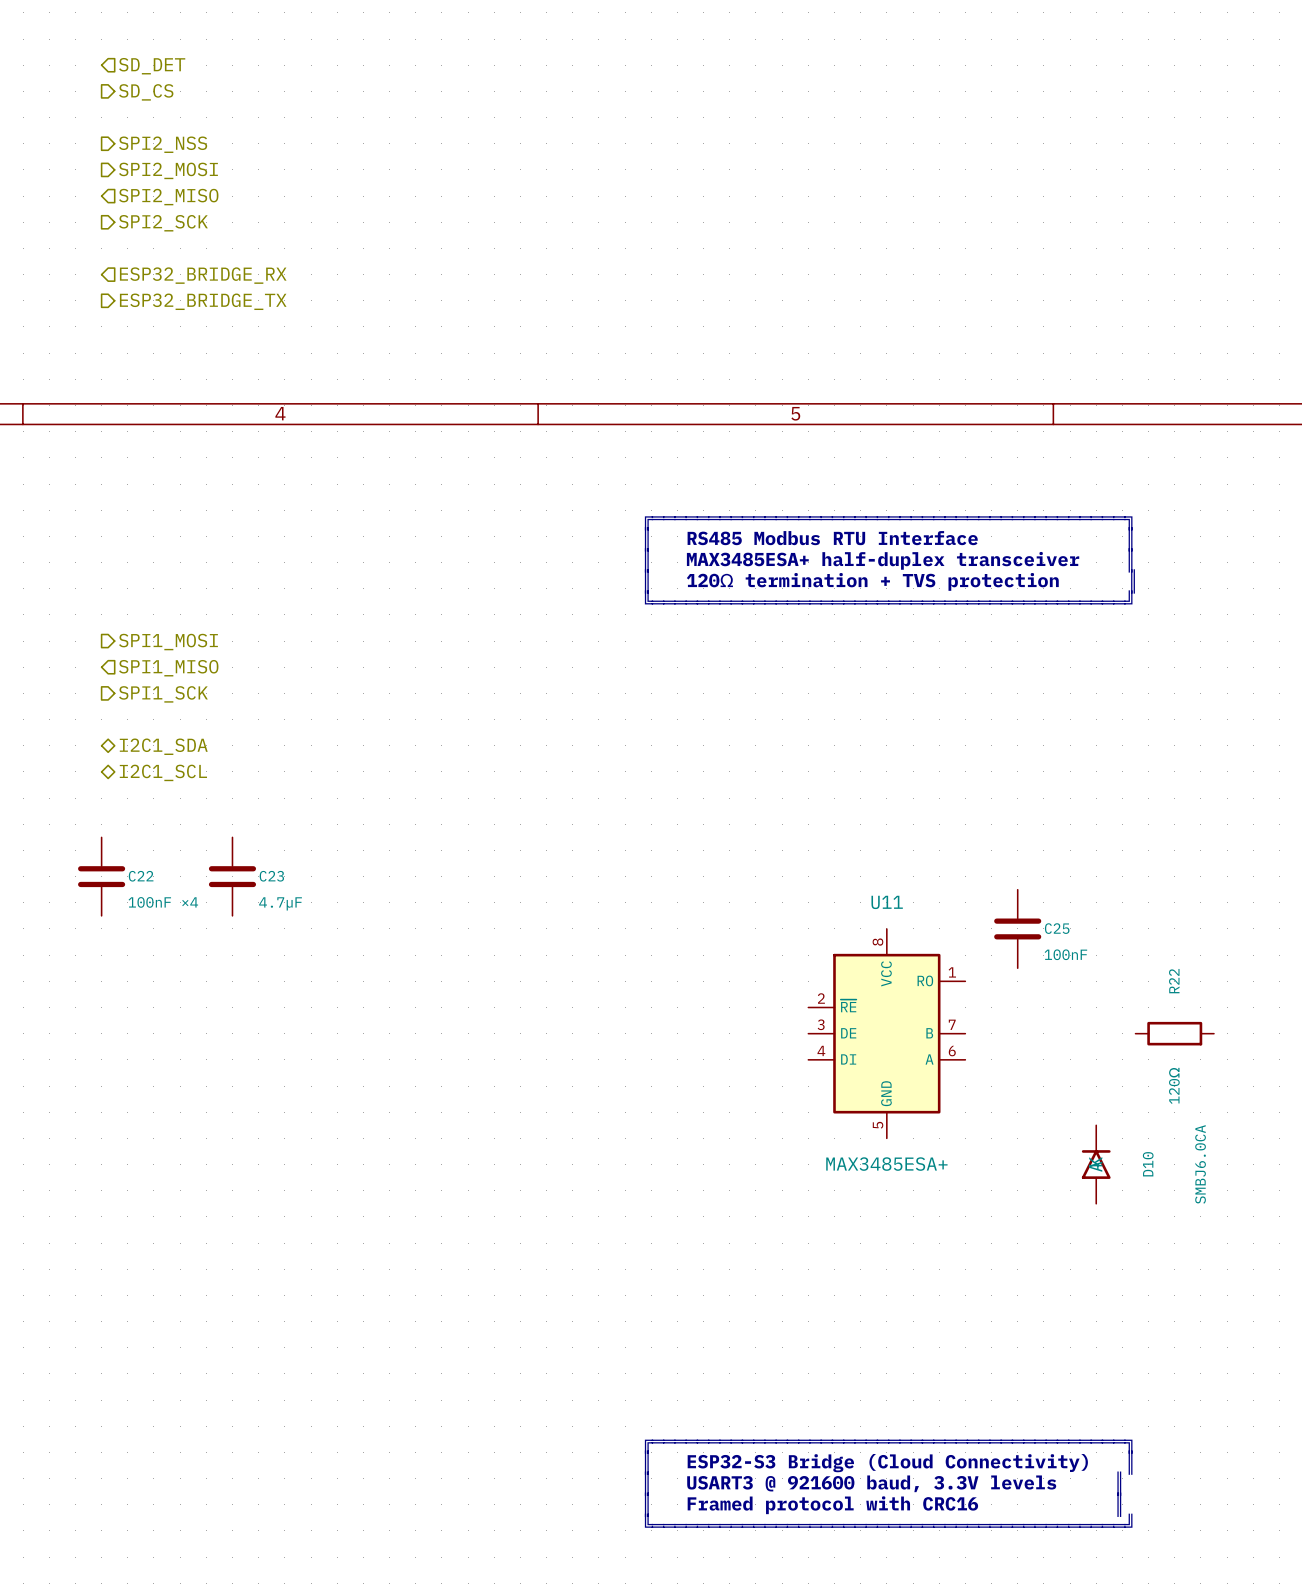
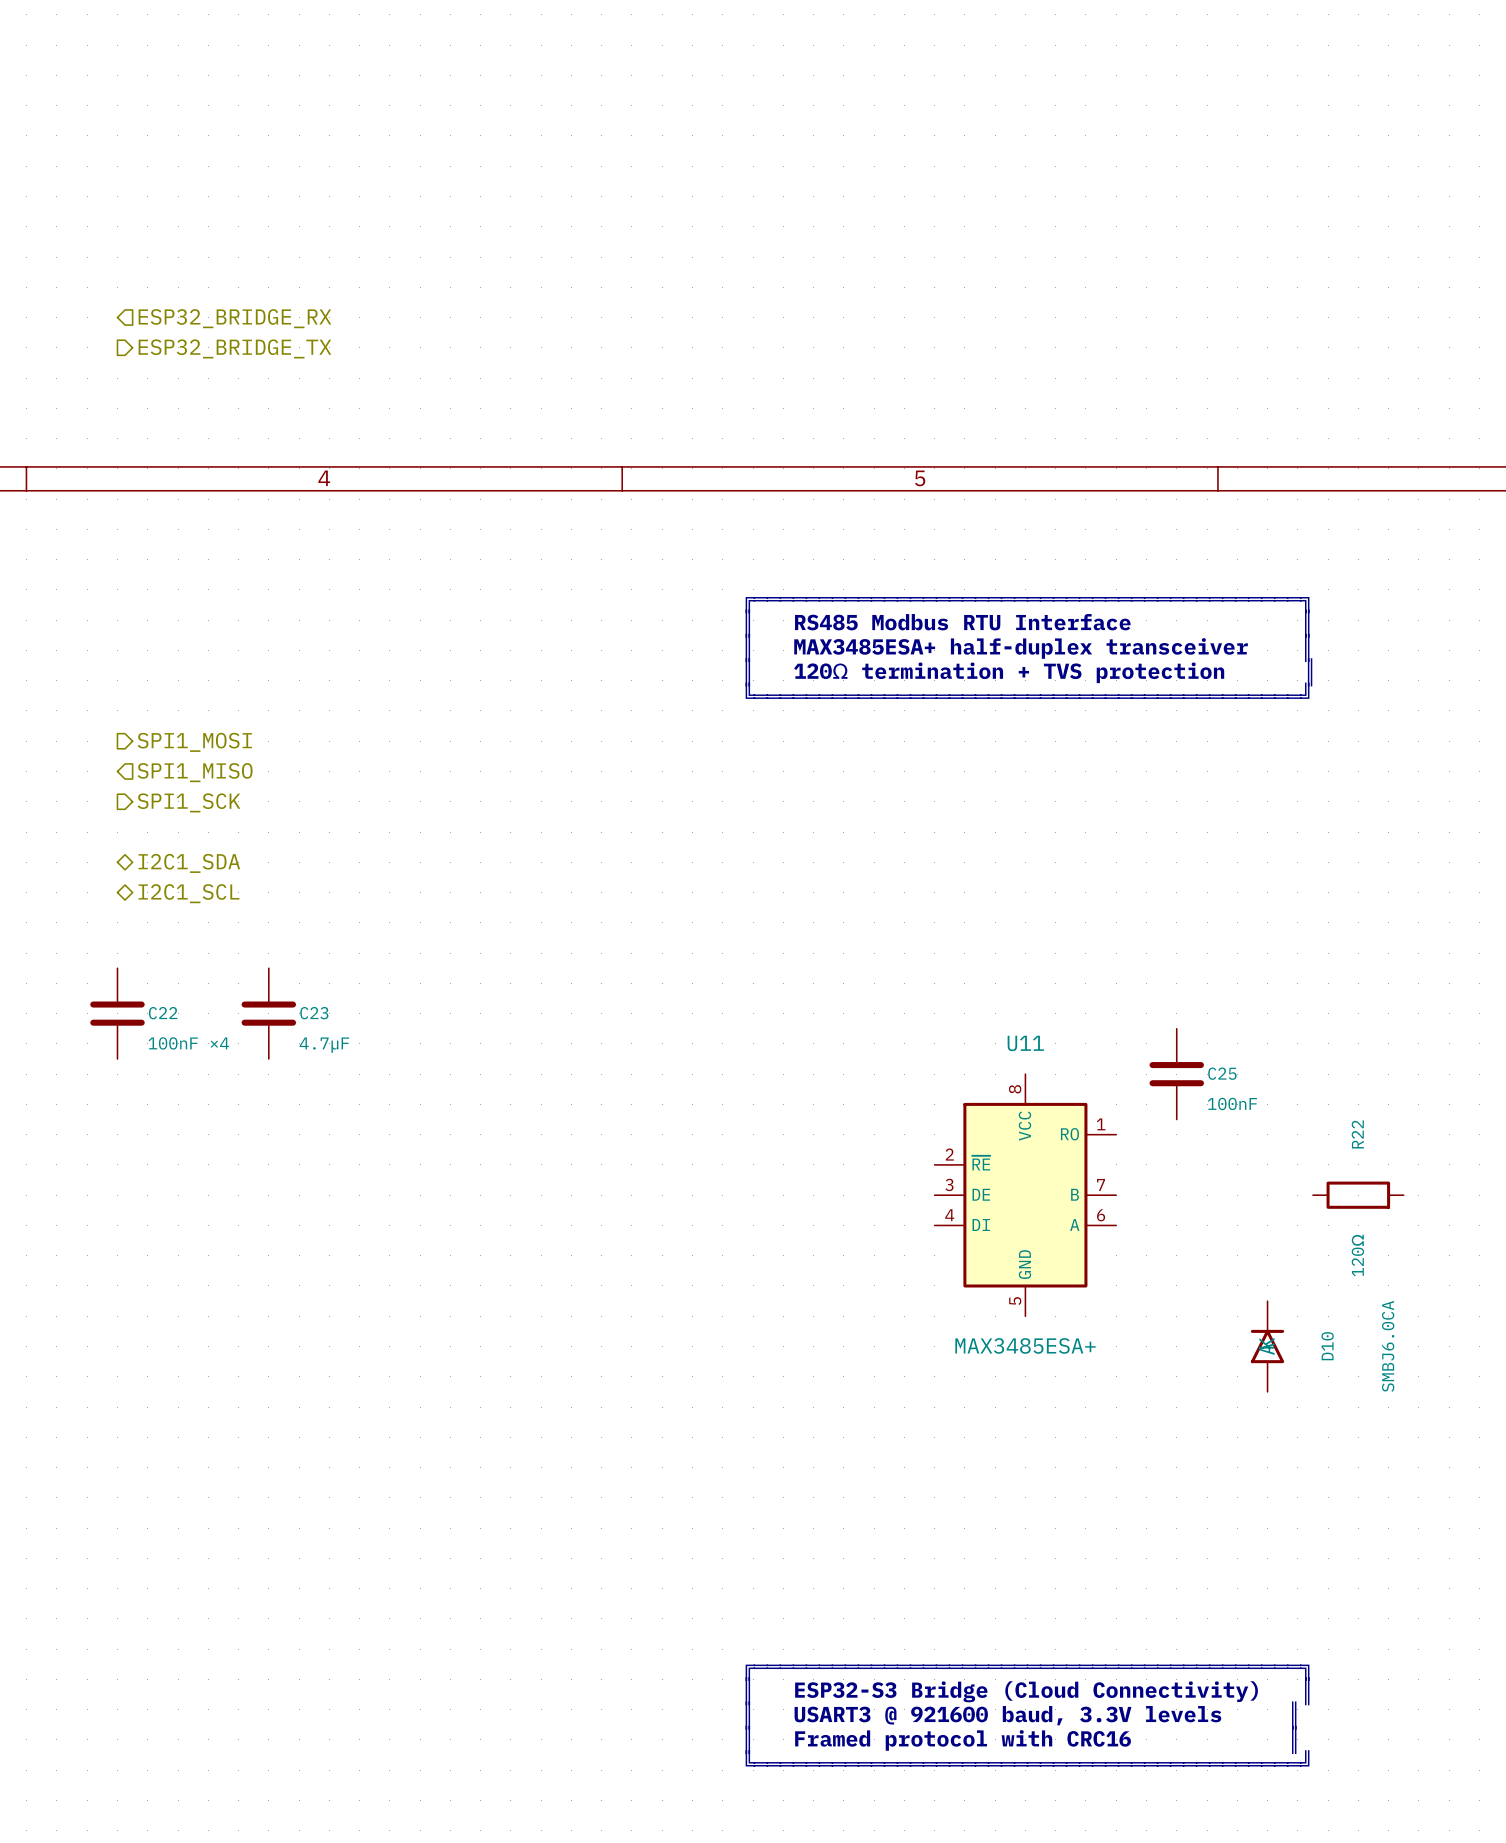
hierarchical label: SD_DET (152, 66) -> none
hierarchical label: SD_CS (146, 92) -> none
hierarchical label: SPI2_NSS (163, 144) -> none
hierarchical label: SPI2_MOSI (168, 170) -> none
hierarchical label: SPI2_MISO (168, 197) -> none
hierarchical label: SPI2_SCK (163, 223) -> none

